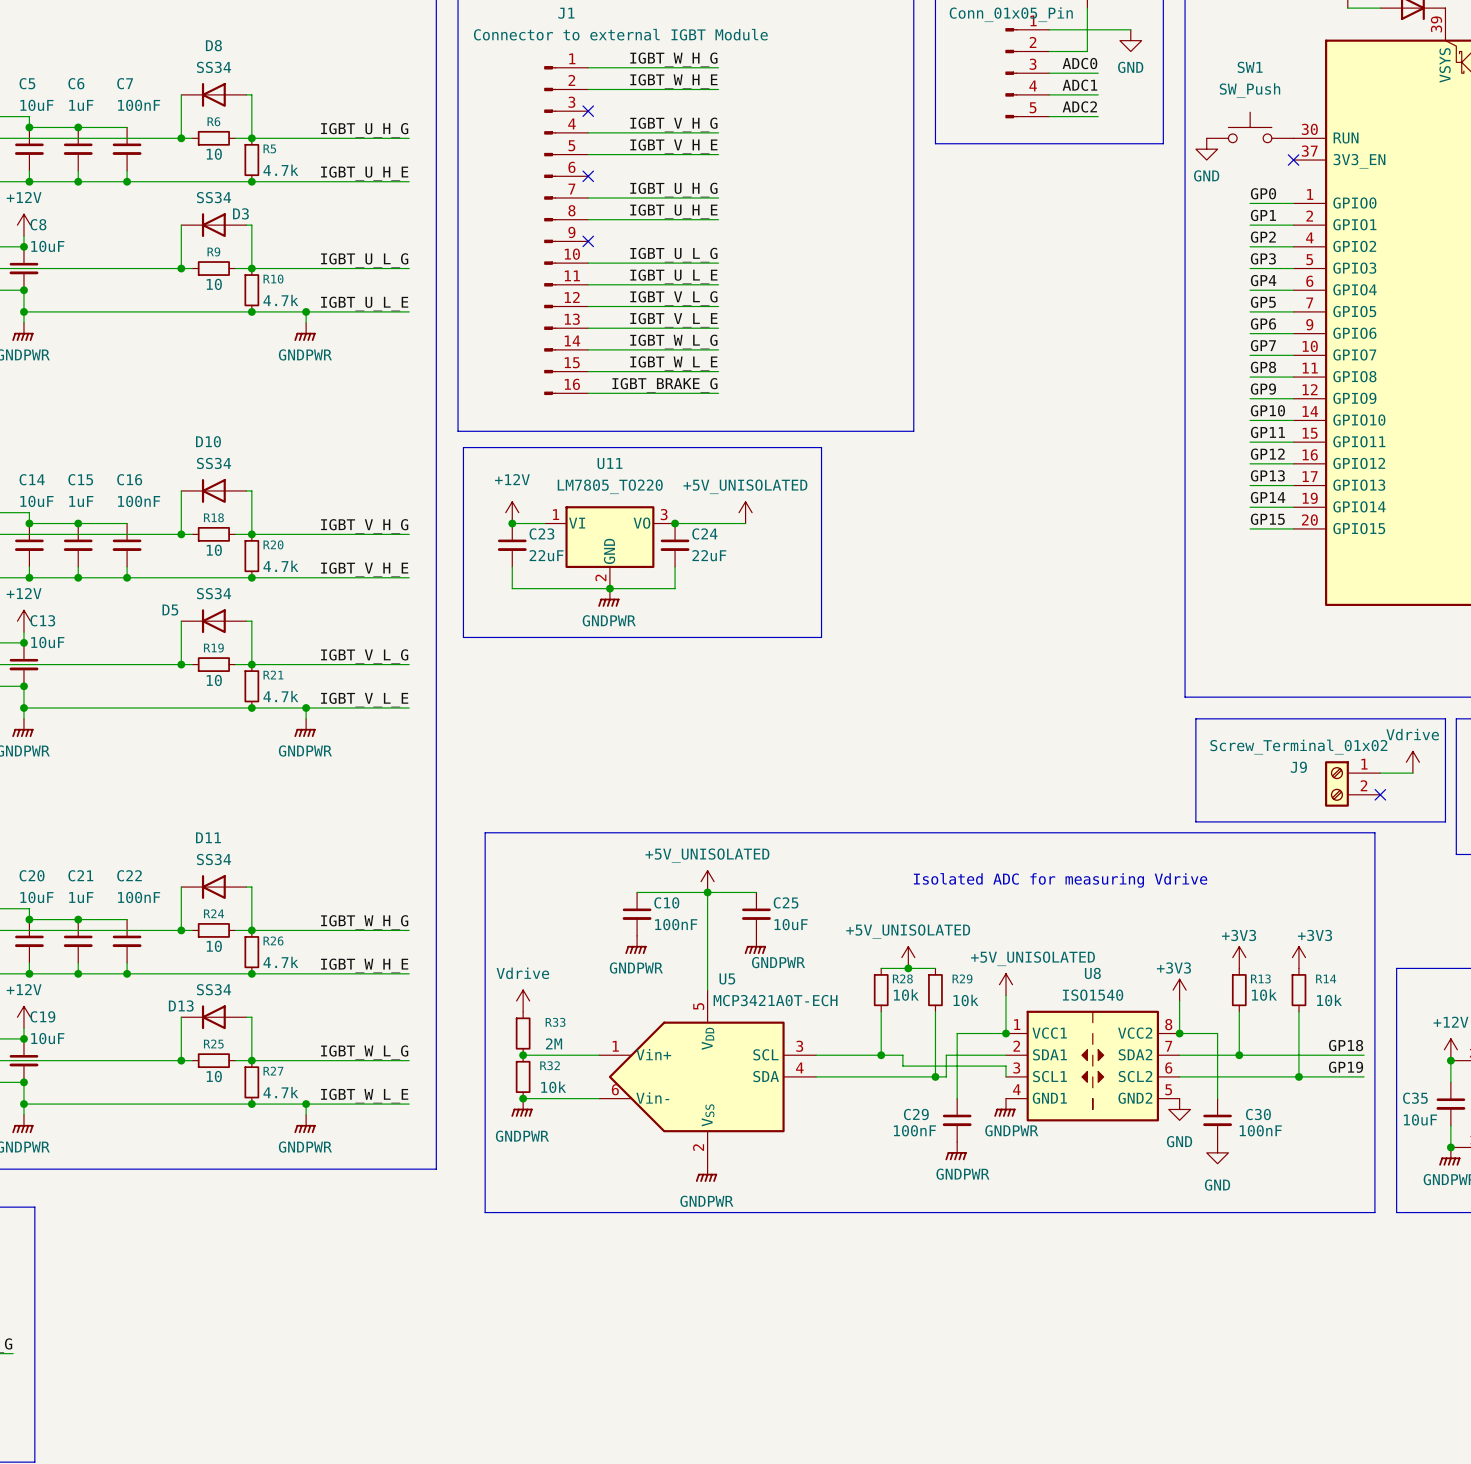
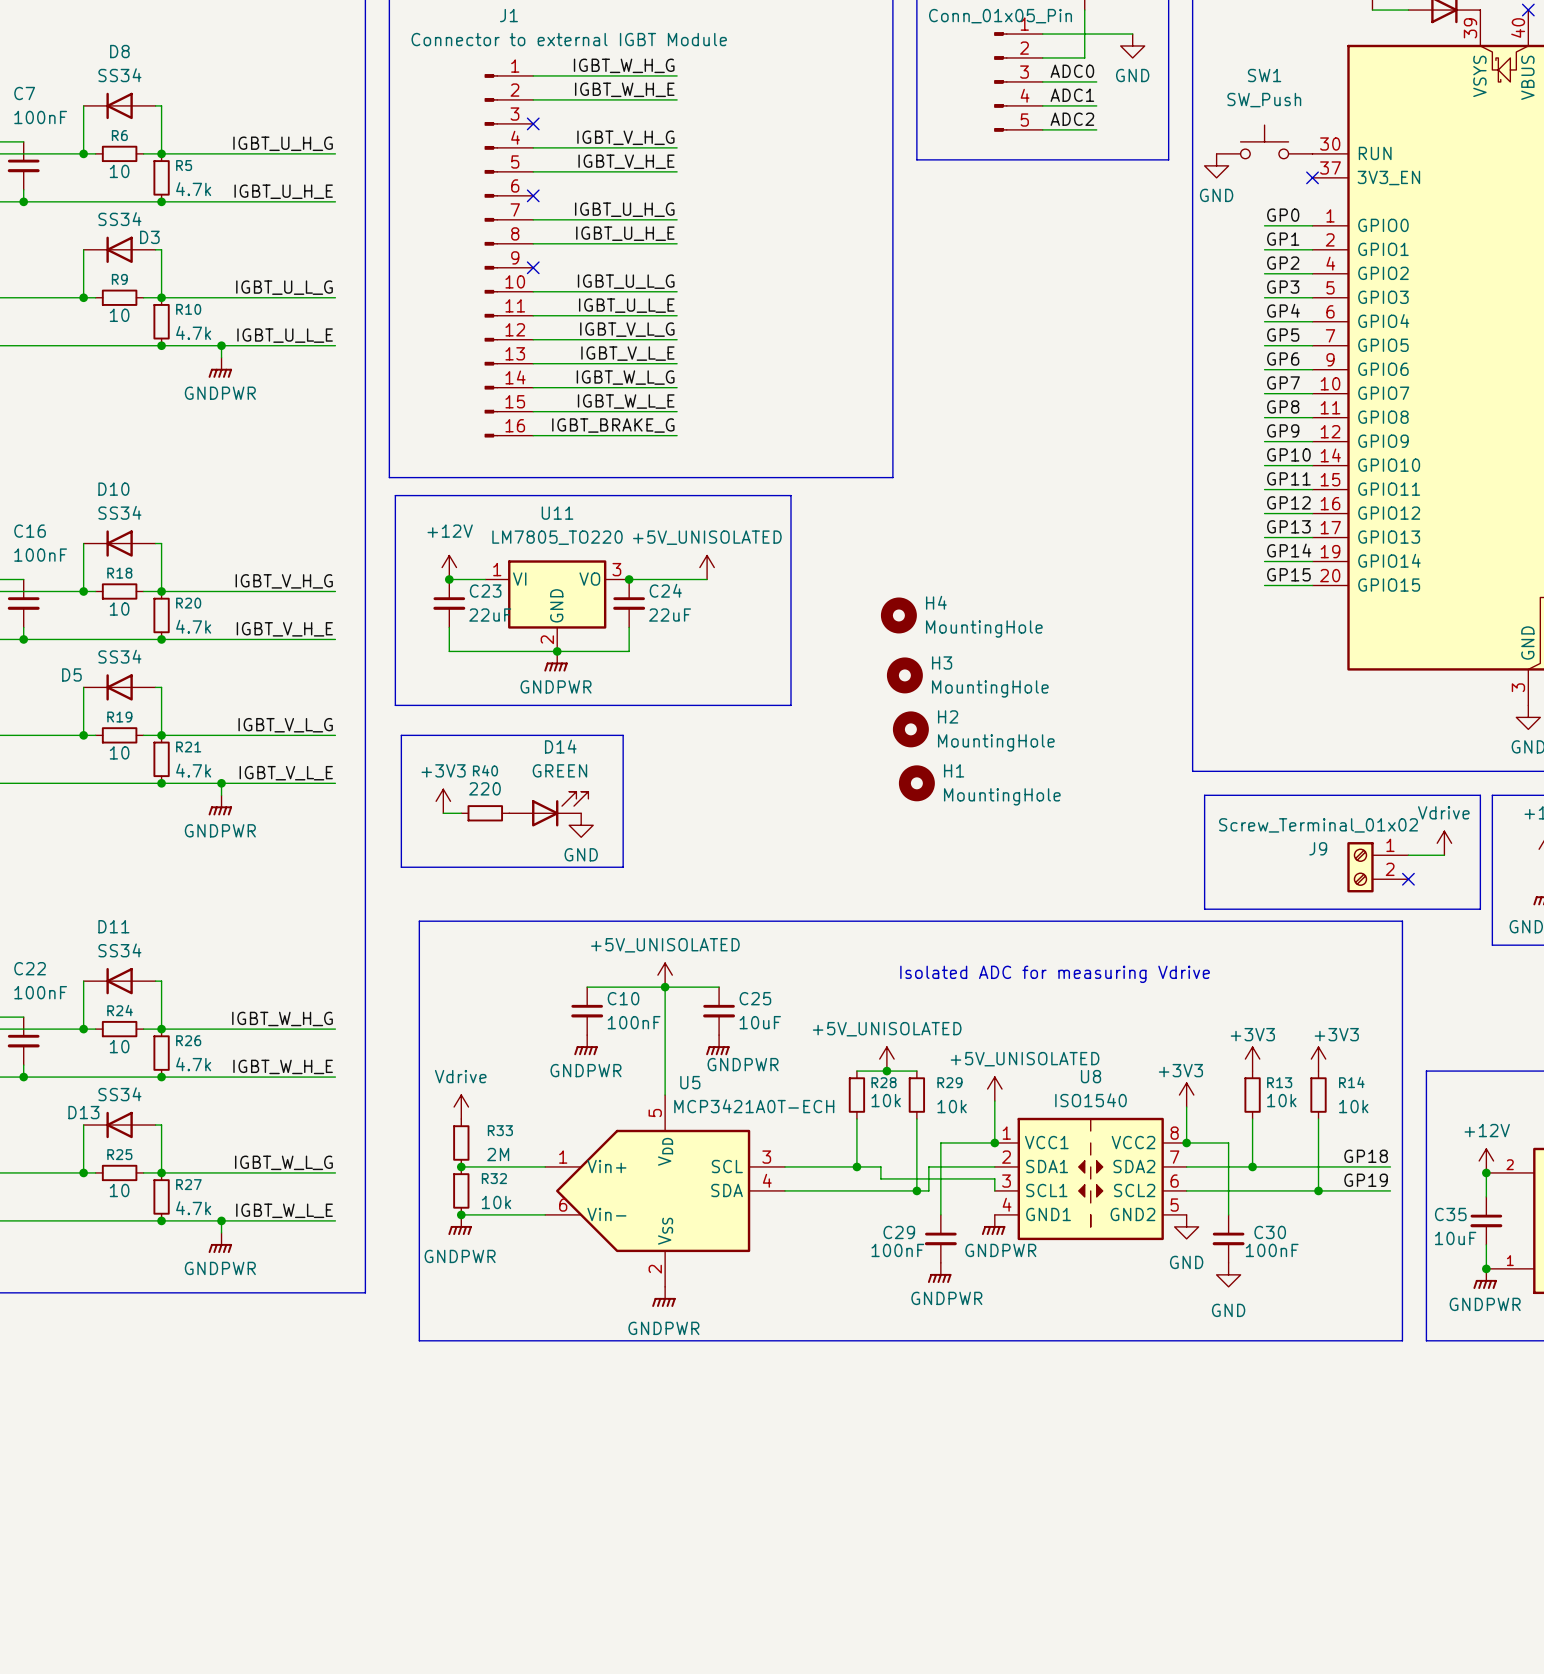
H4: none -> MountingHole (898, 615)
H3: none -> MountingHole (904, 675)
H2: none -> MountingHole (910, 729)
line: none -> (401, 735) (623, 735) (623, 867) (401, 867) (401, 735)
H1: none -> MountingHole (916, 783)
power symbol: none -> +3V3 (443, 801)
D14: none -> GREEN (548, 809)
wire: none -> (443, 813) (461, 813)
R40: none -> 220 (485, 813)
power symbol: none -> GND (581, 825)

